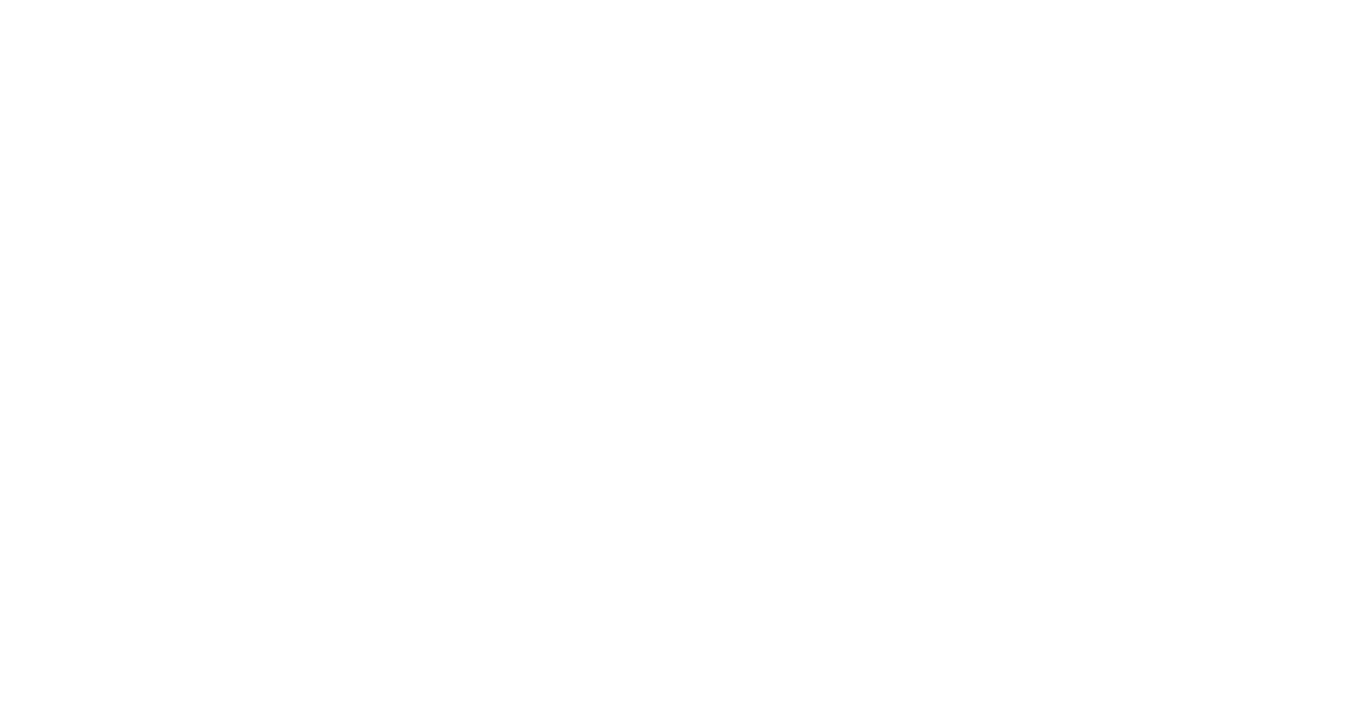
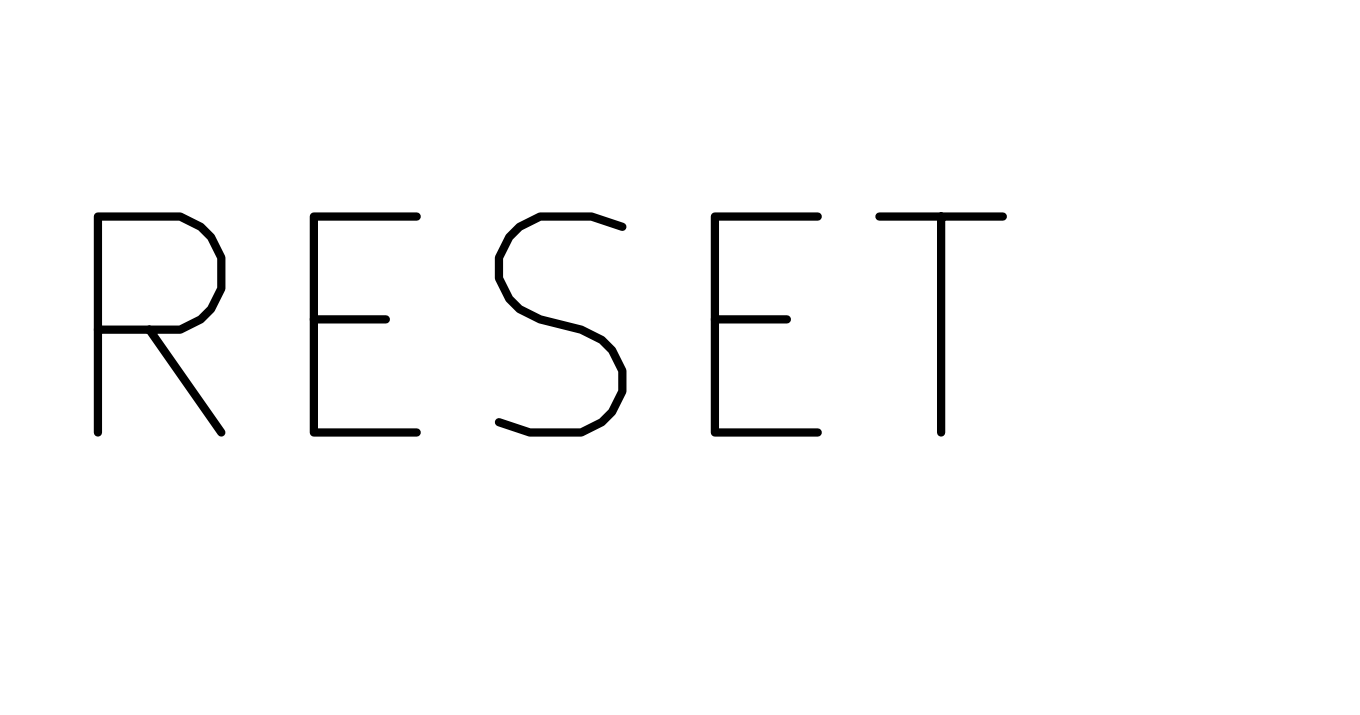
text: none -> RESET (550, 324)

